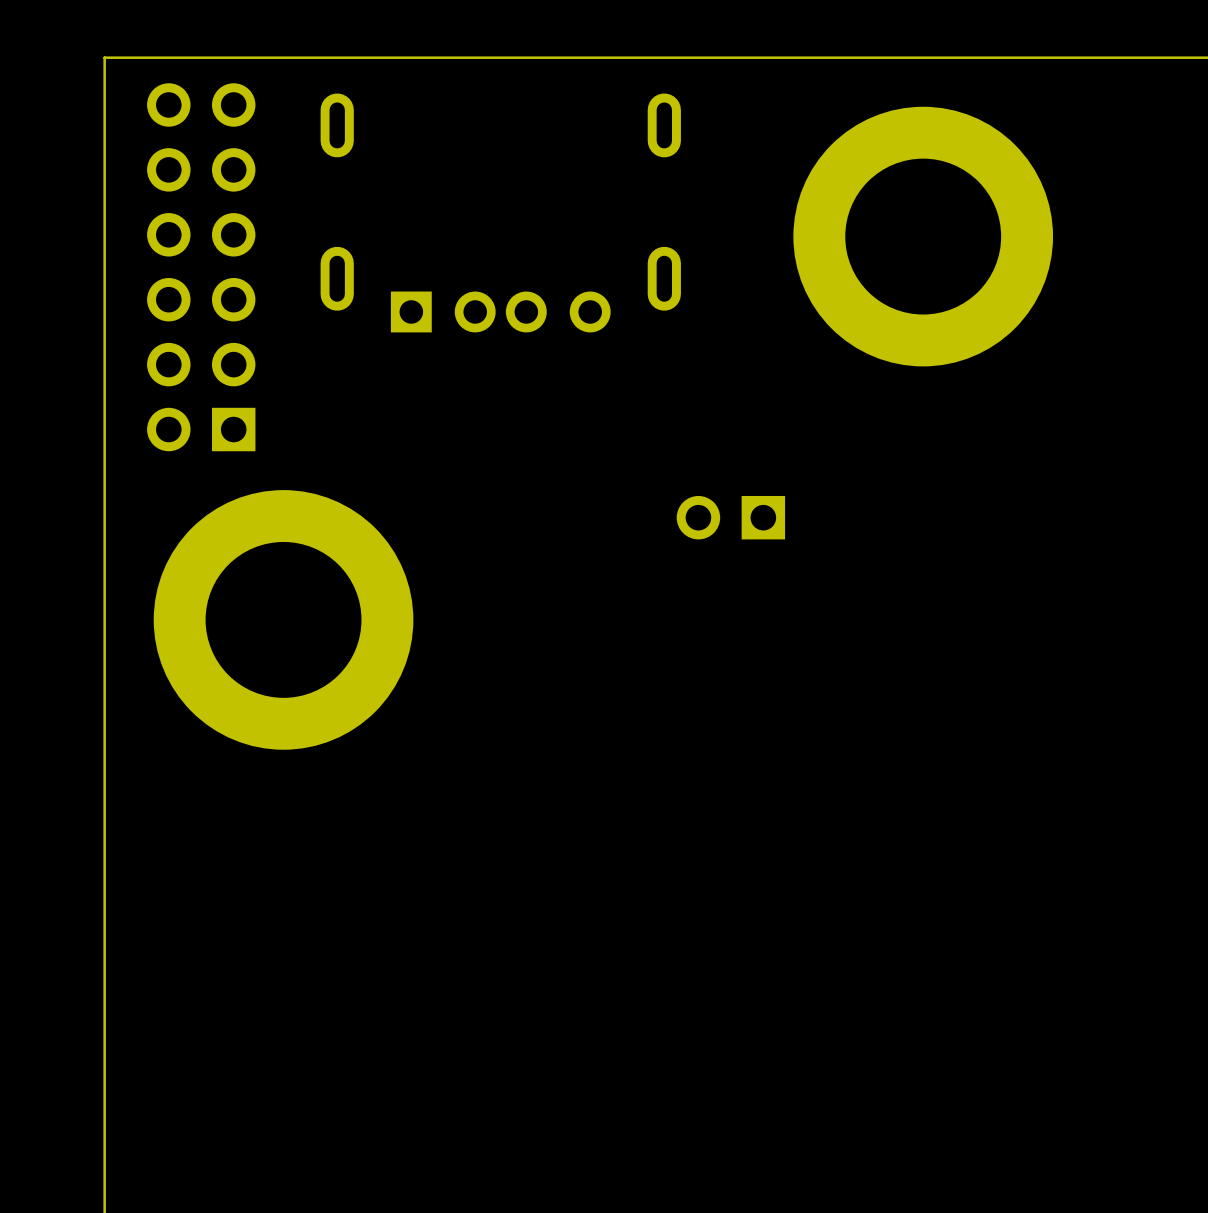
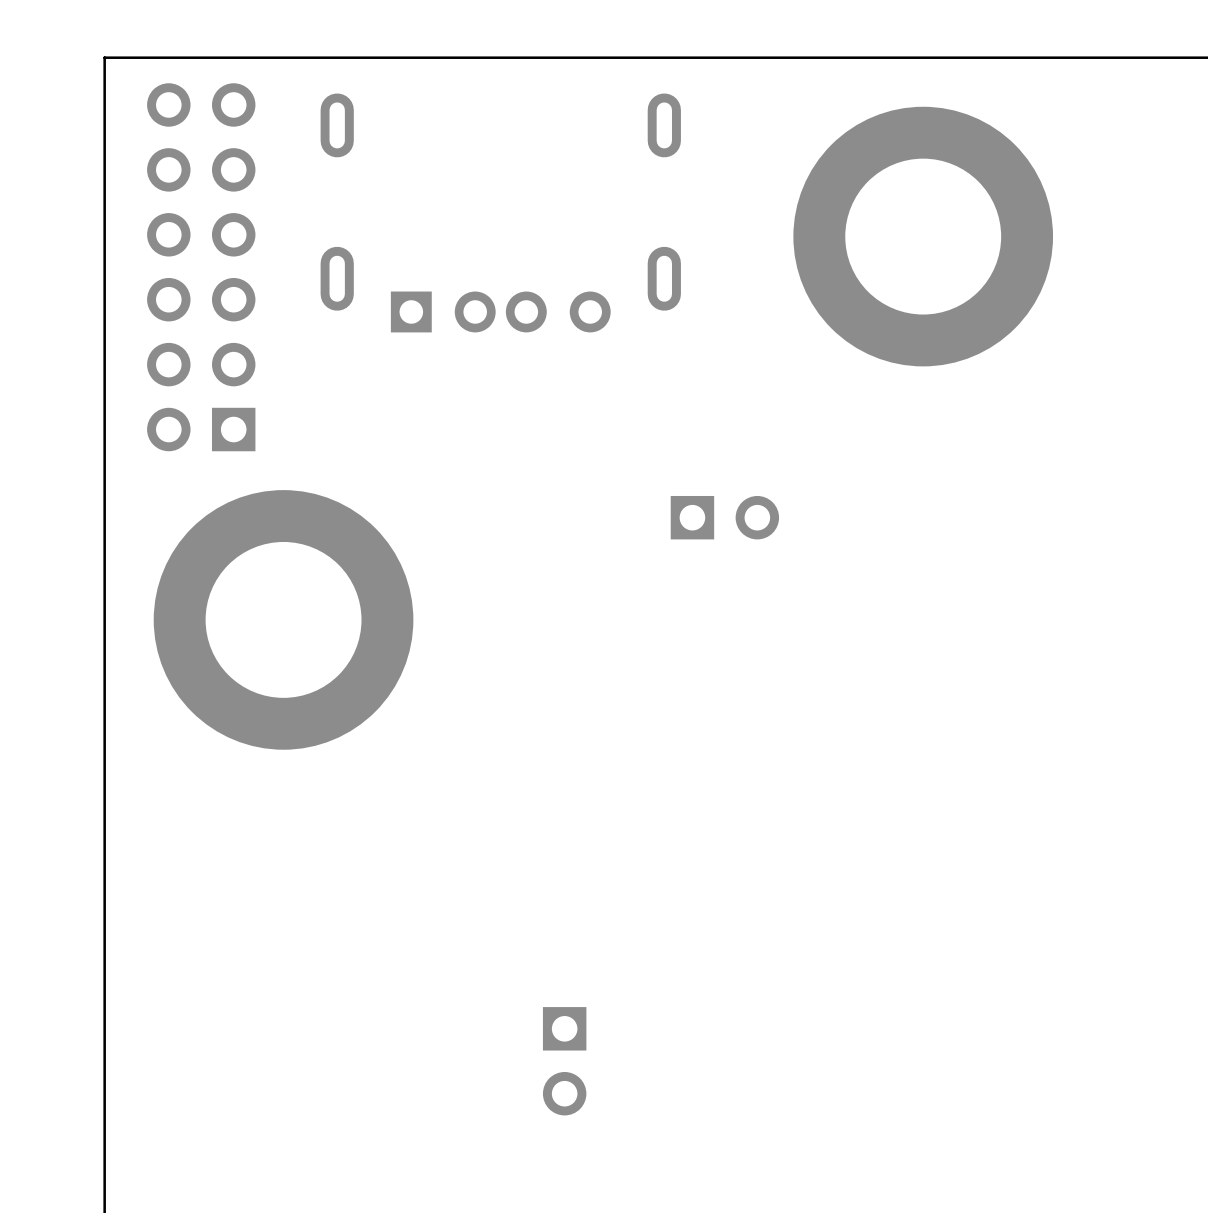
part rotation: 0° (730, 517) -> 180° (724, 517)
part: none -> (564, 1061)

